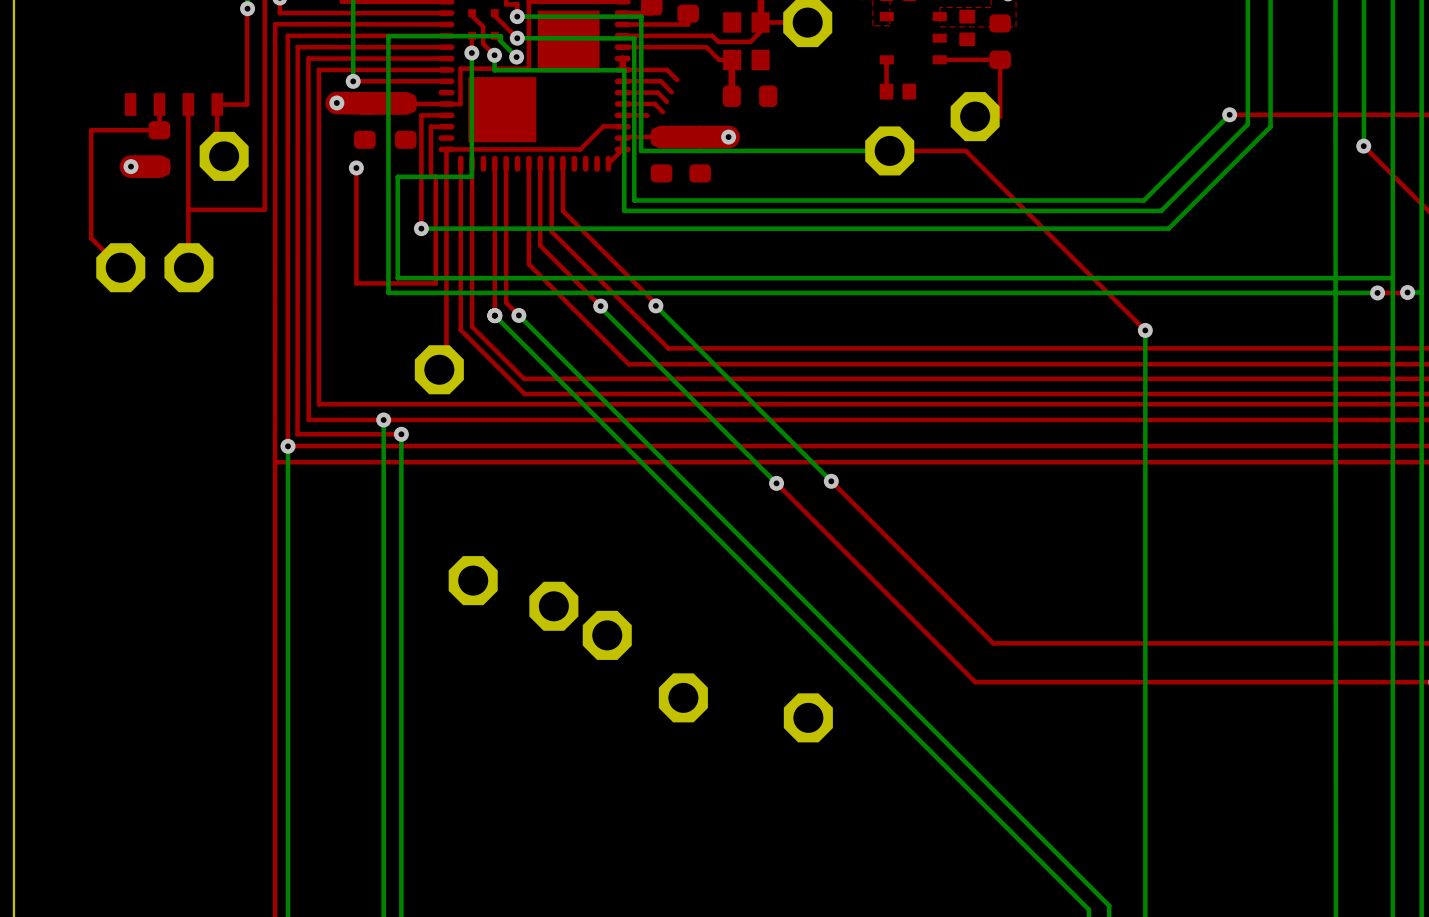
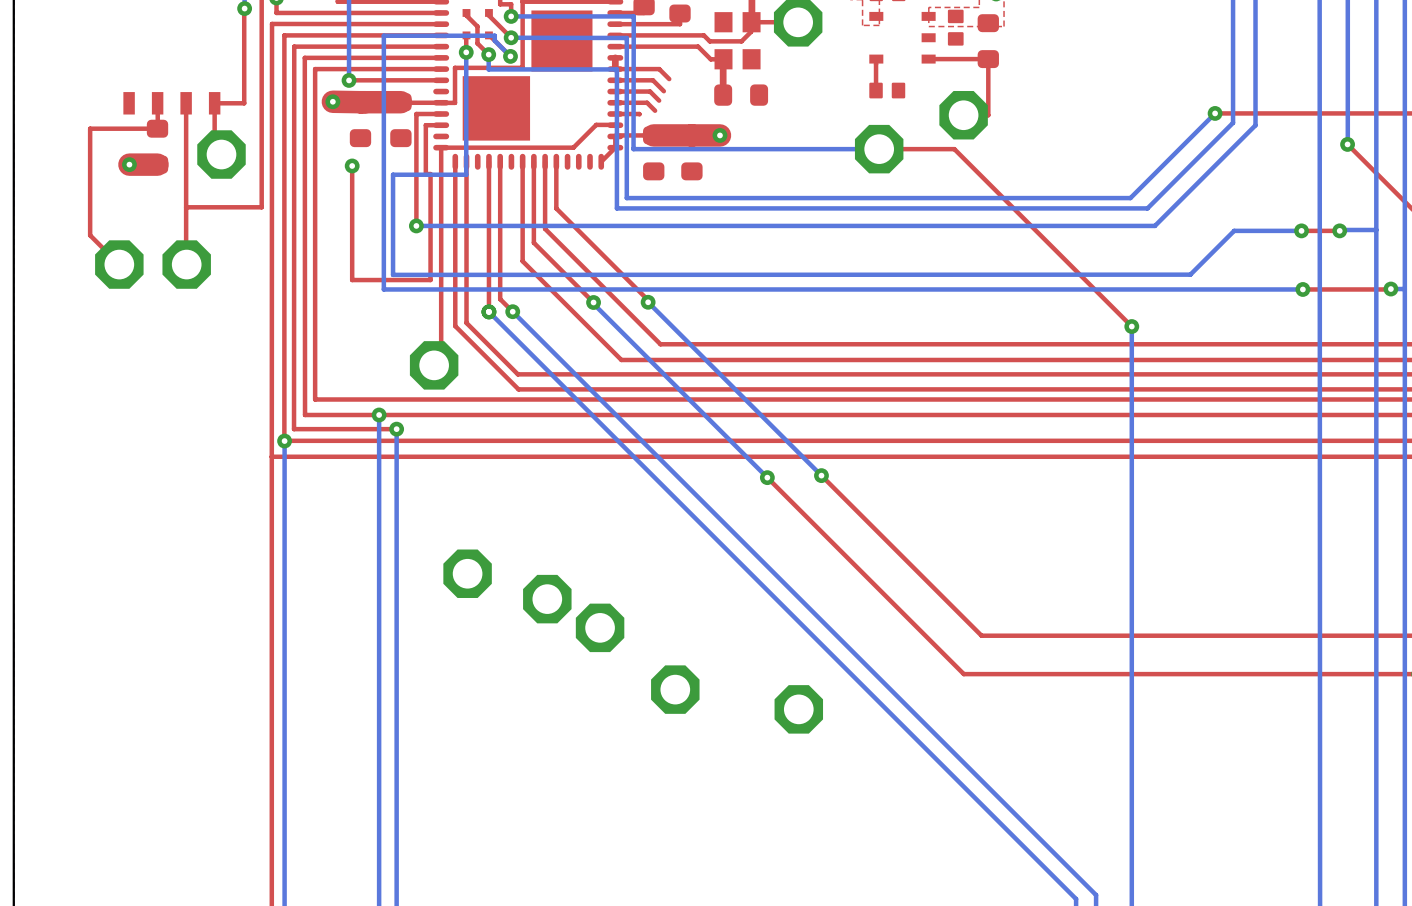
bottom track: none -> (1376, 229) (1339, 230)
via: none -> (1301, 230)
top track: none -> (1339, 230) (1301, 230)
via: none -> (1339, 230)
bottom track: (1392, 278) (397, 278) -> (1301, 230) (1234, 230) (1190, 274) (393, 274)
via: none -> (1302, 289)
top track: none -> (1361, 289) (1302, 289)
bottom track: (1377, 292) (1318, 292) -> none
via: (1377, 292) -> none

